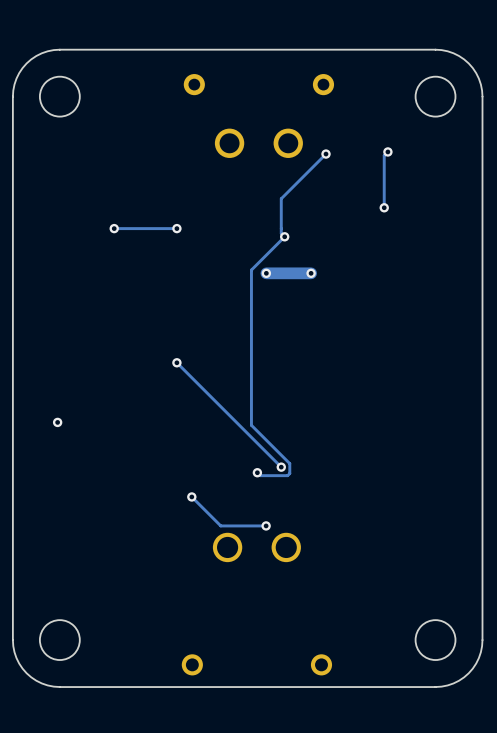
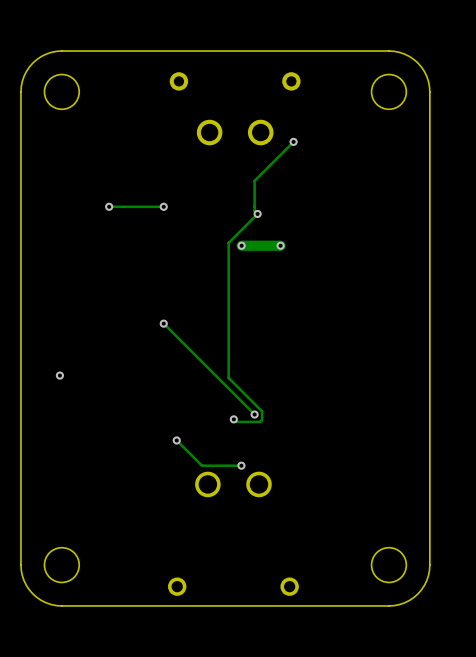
track: (387, 151) (384, 155) (384, 207) -> none
via: (387, 151) -> none
via: (384, 207) -> none

